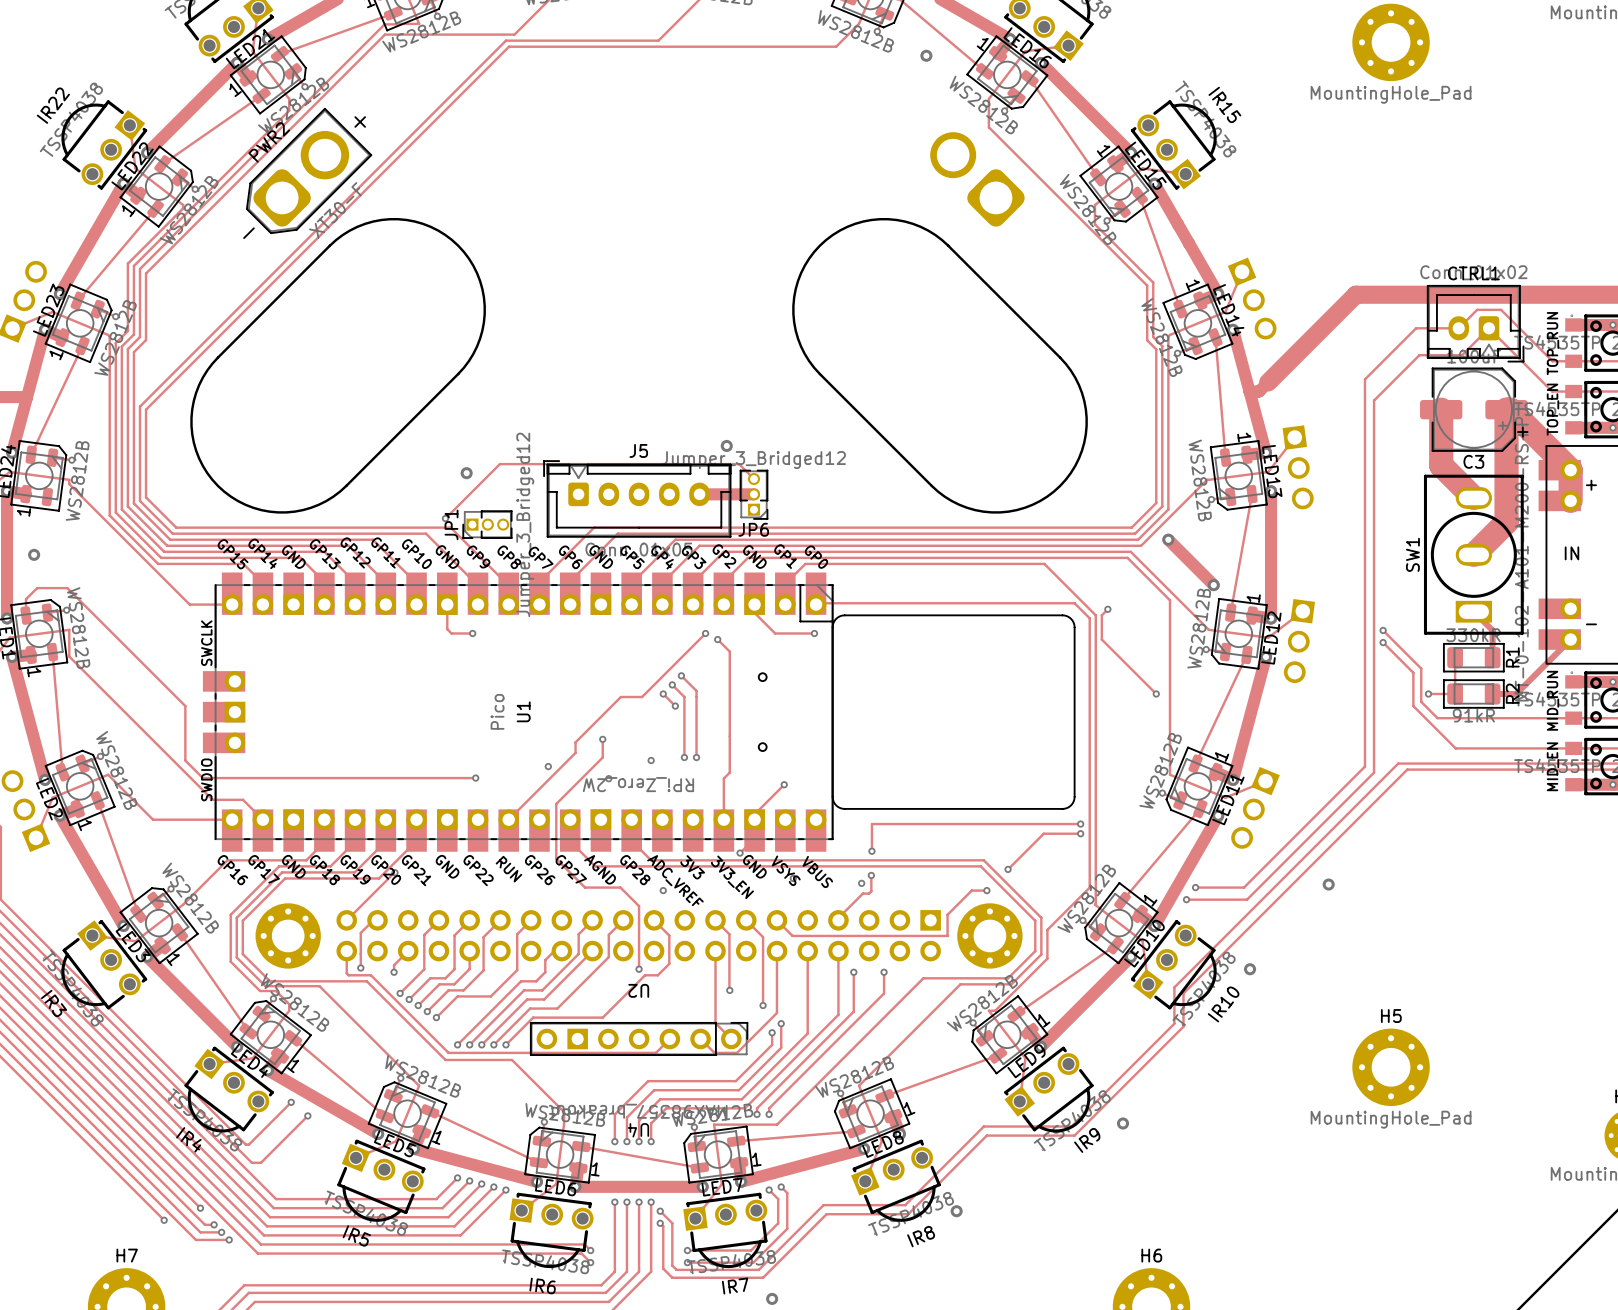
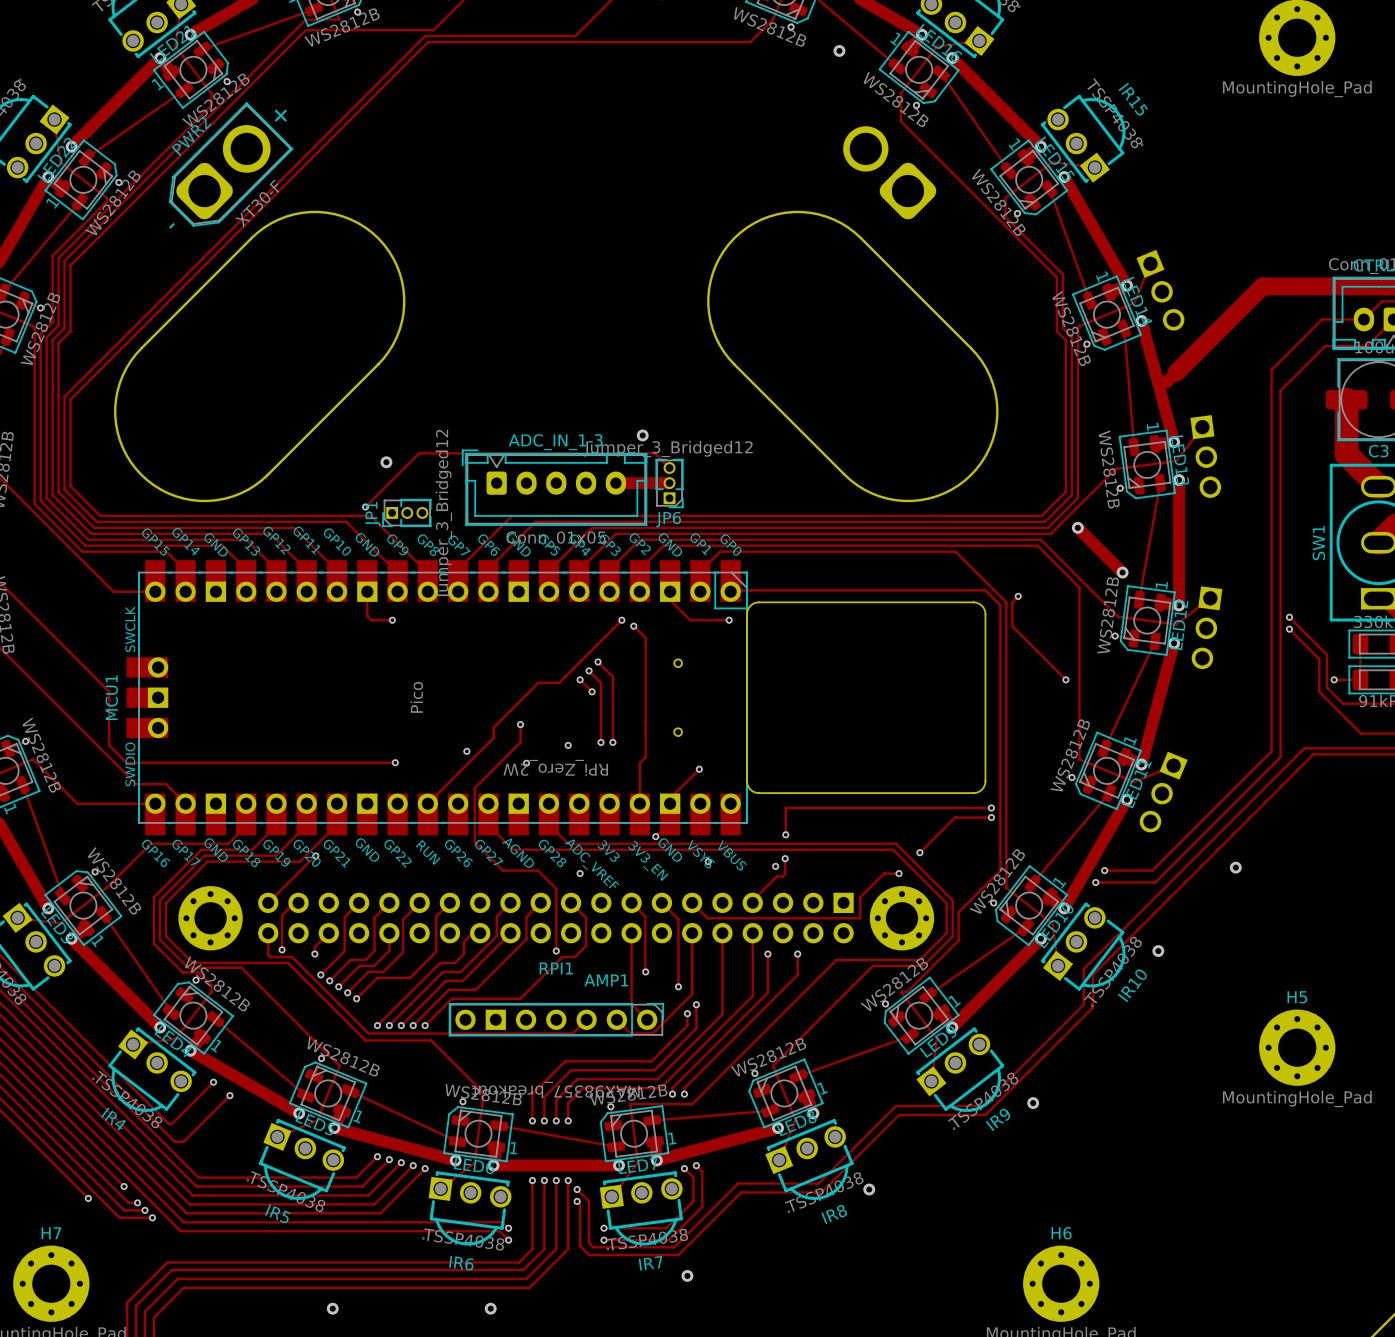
J5 name: J5 (638, 450) -> ADC_IN_1-3 (555, 442)
U1 name: U1 (523, 711) -> MCU1 (111, 697)
U2 name: U2 (638, 990) -> RPI1 (556, 968)
U4 name: U4 (638, 1130) -> AMP1 (606, 980)

